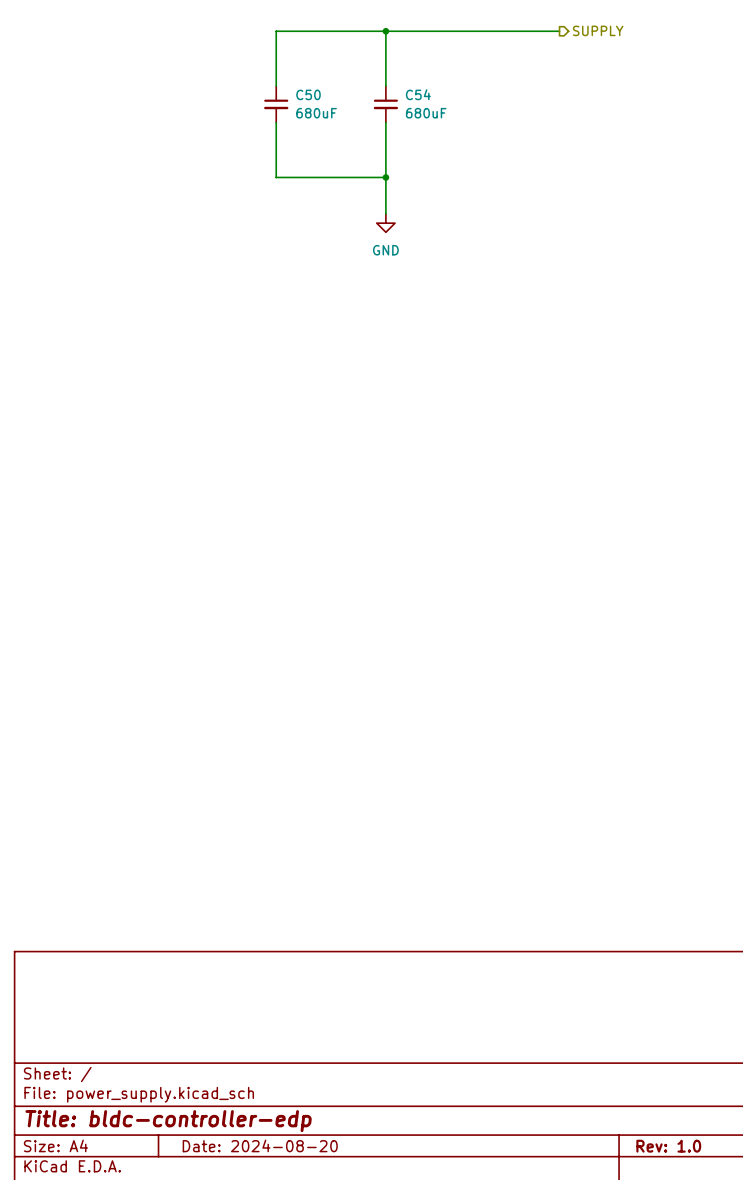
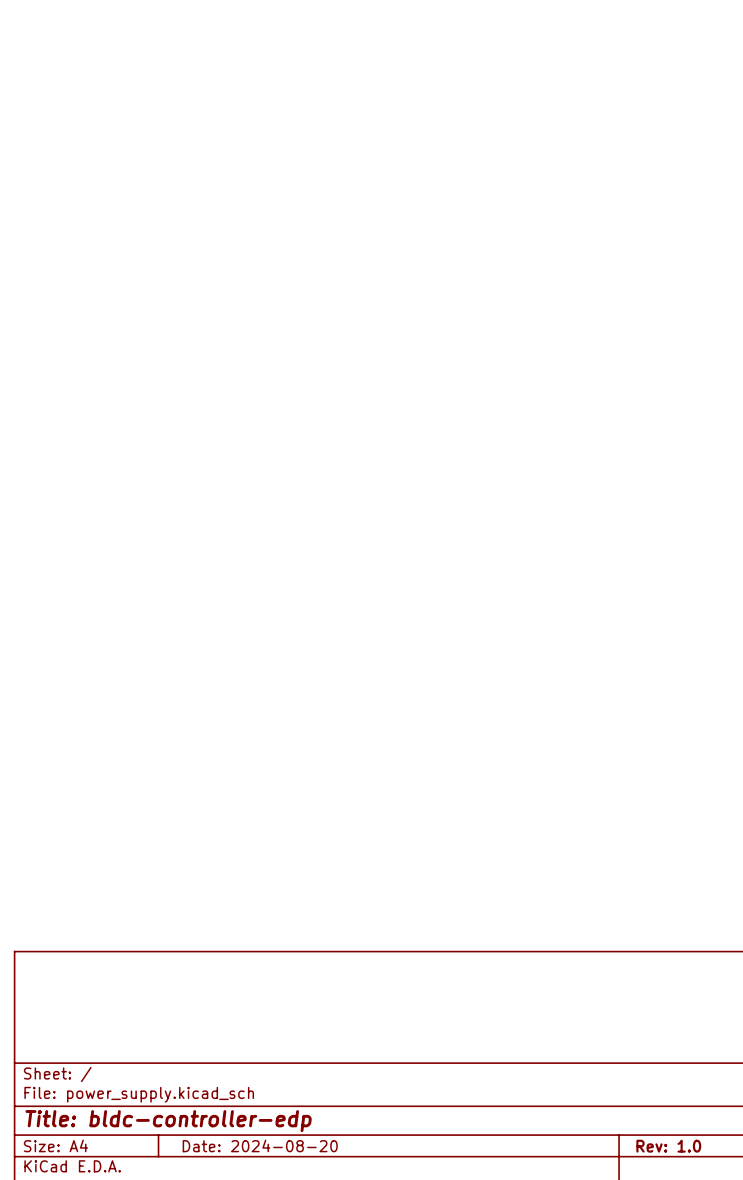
hierarchical label: SUPPLY (598, 30) -> none
wire: (385, 31) (385, 86) -> none
junction: (385, 31) -> none
wire: (559, 31) (276, 31) (276, 86) -> none
C50: 680uF (276, 104) -> none
C54: 680uF (385, 104) -> none
wire: (276, 122) (276, 177) (385, 177) -> none
wire: (385, 122) (385, 214) -> none
junction: (385, 177) -> none
power symbol: GND (385, 223) -> none

